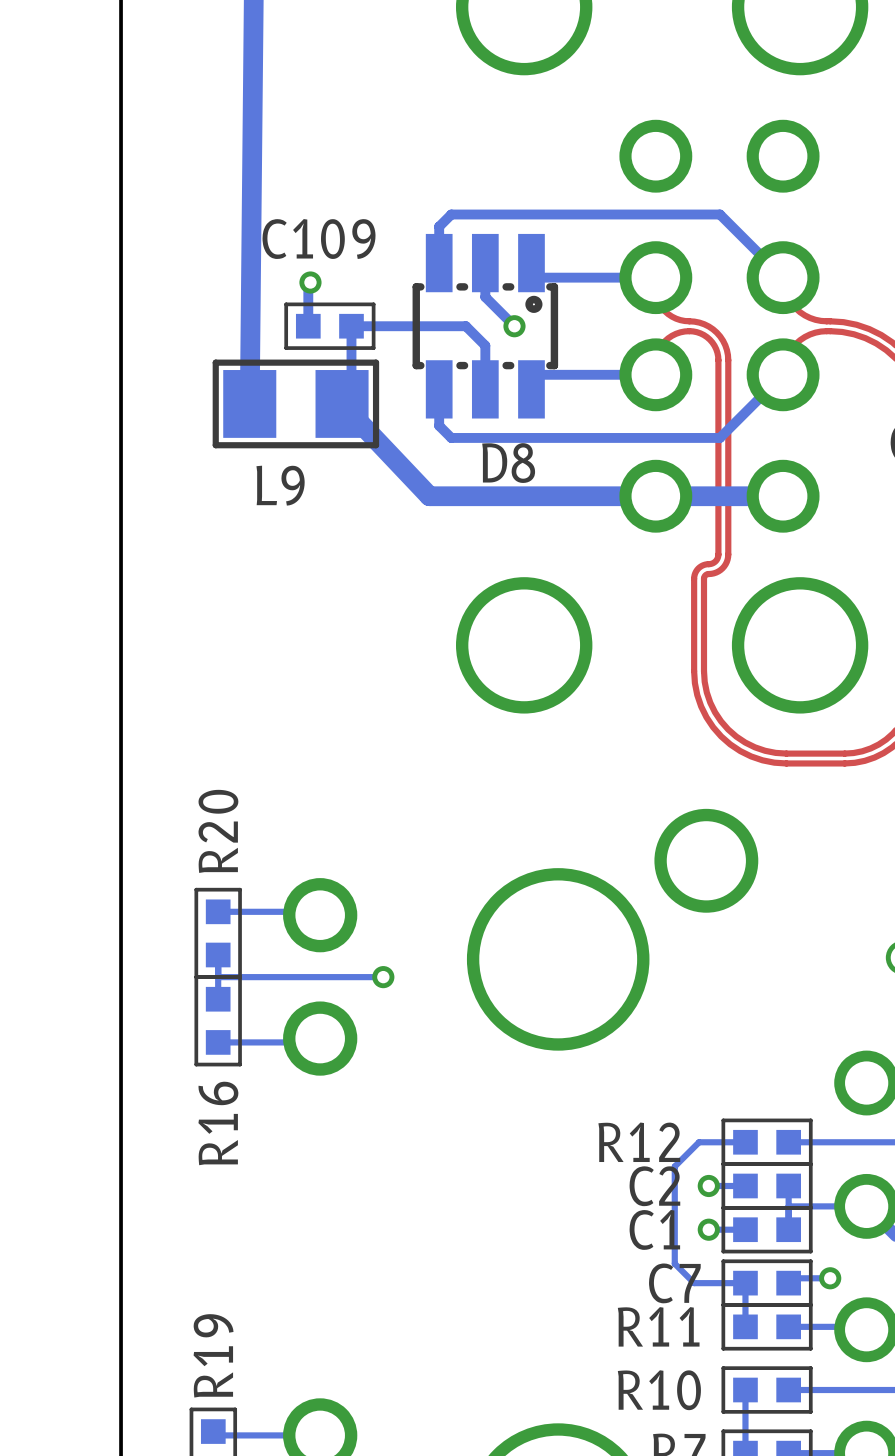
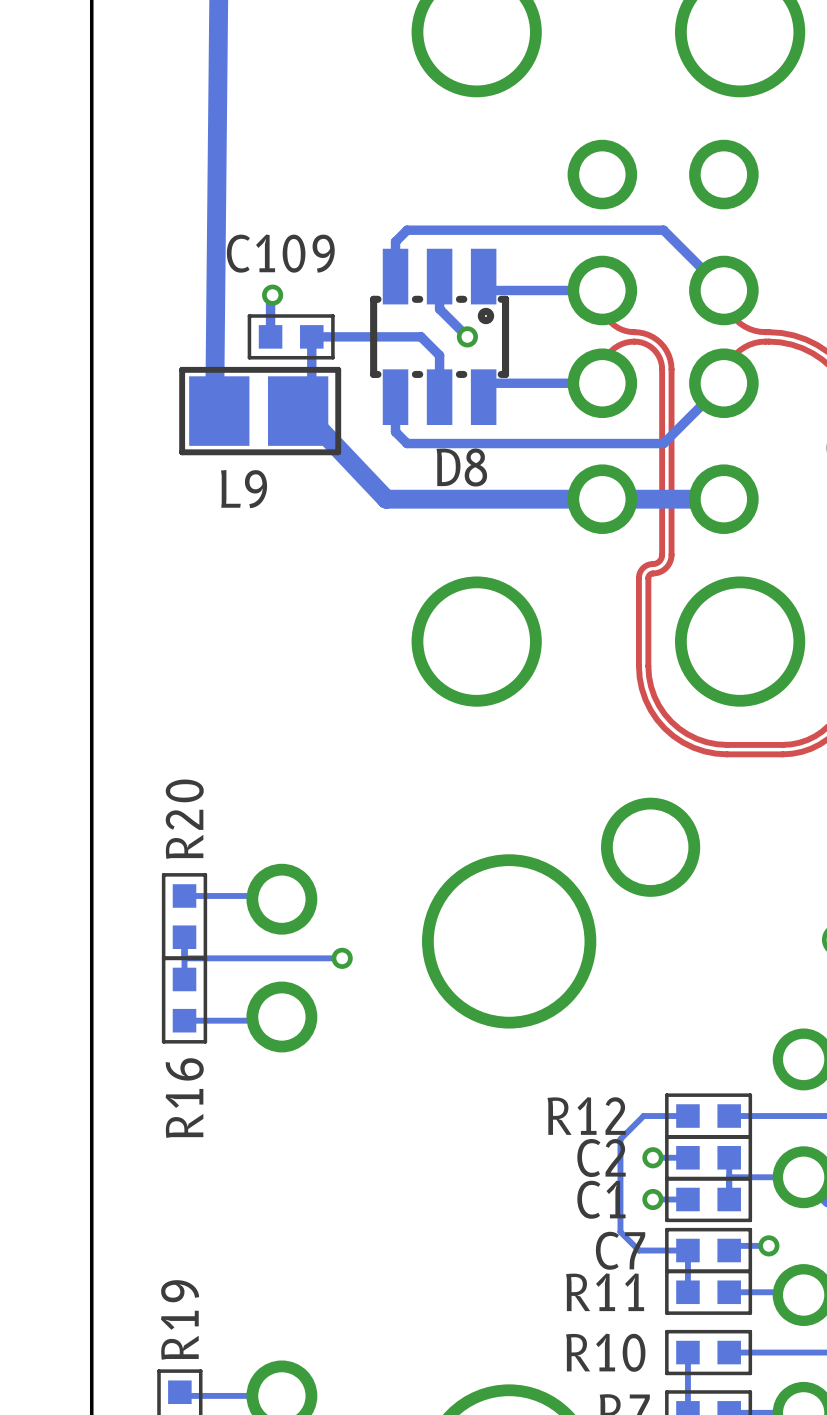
L9 footprint: [212, 359, 380, 449] -> [179, 366, 342, 456]

